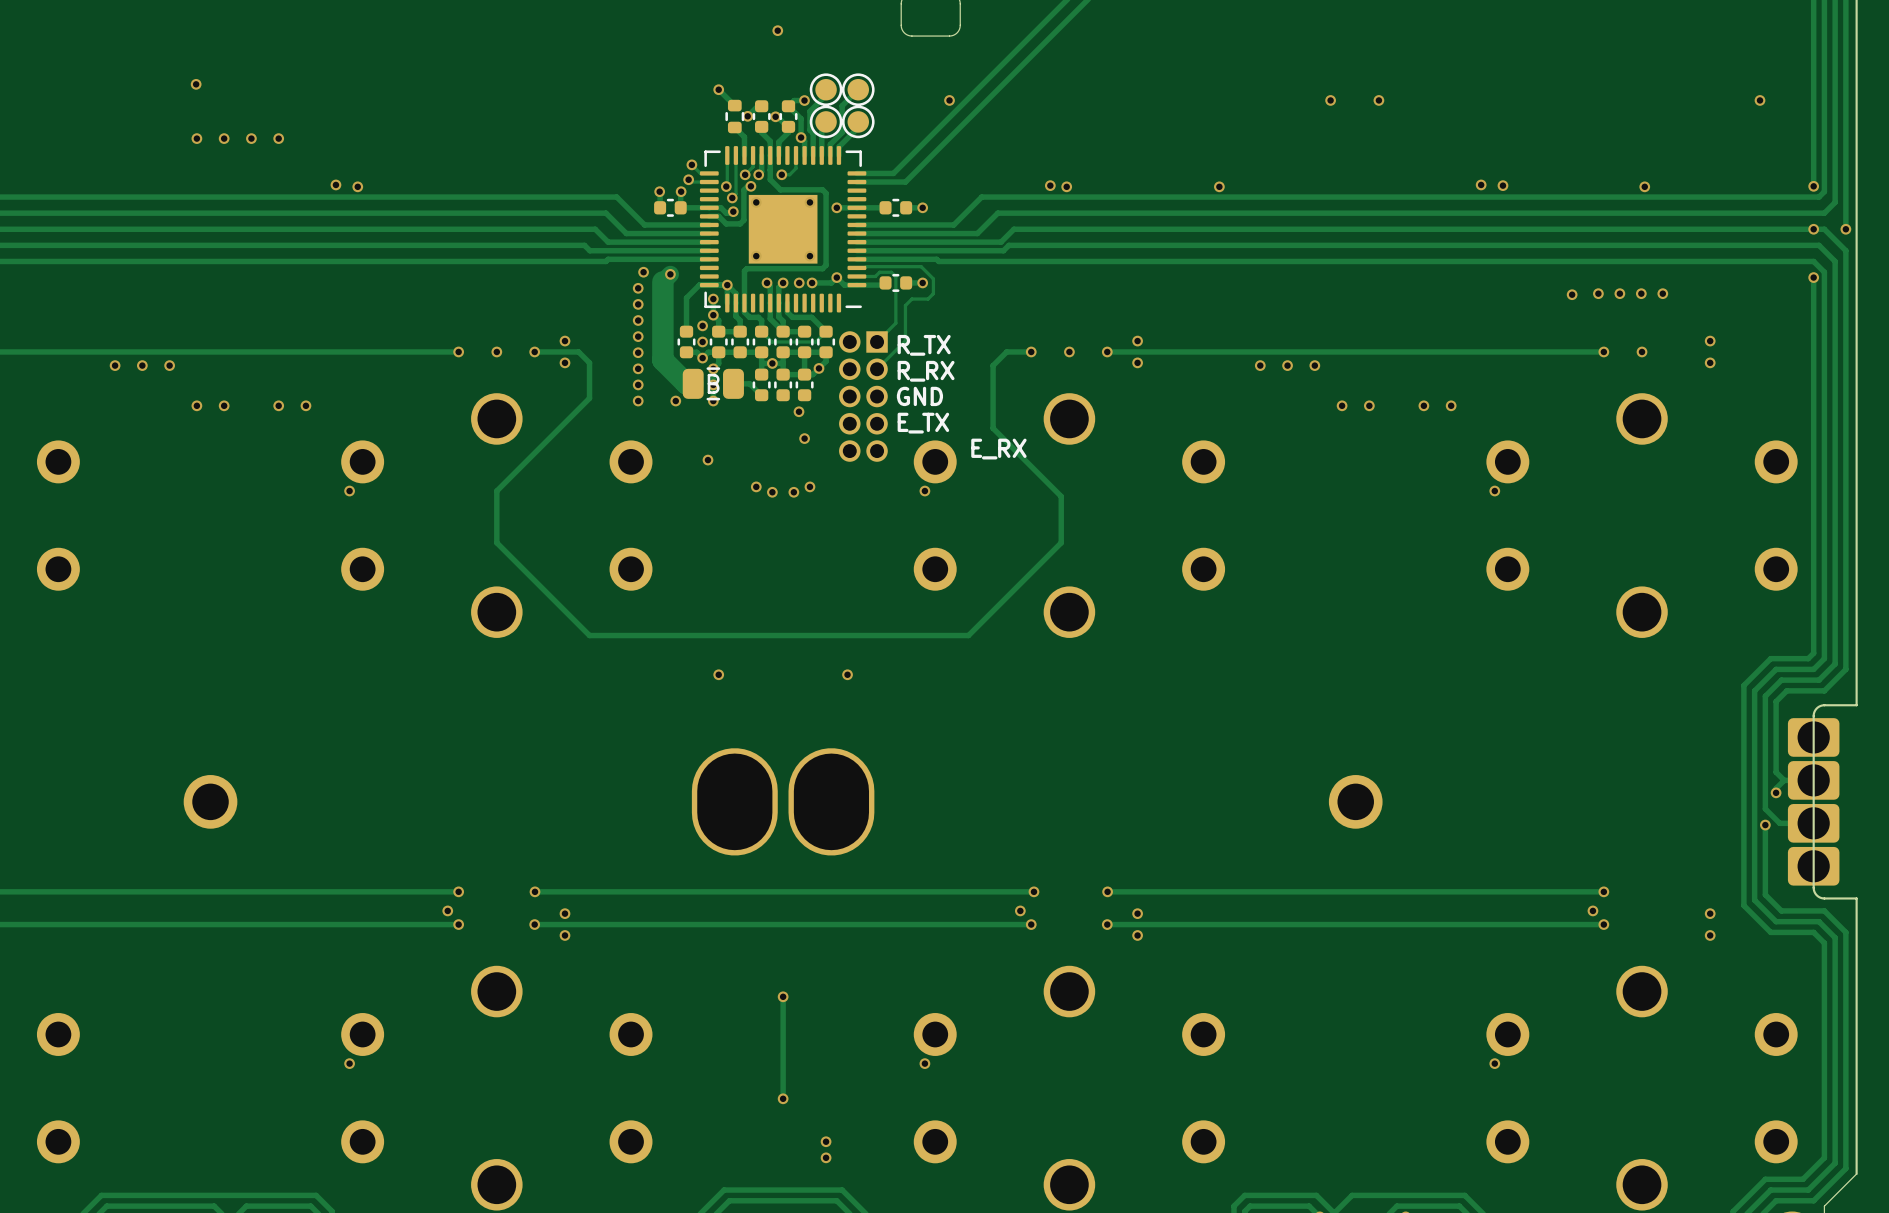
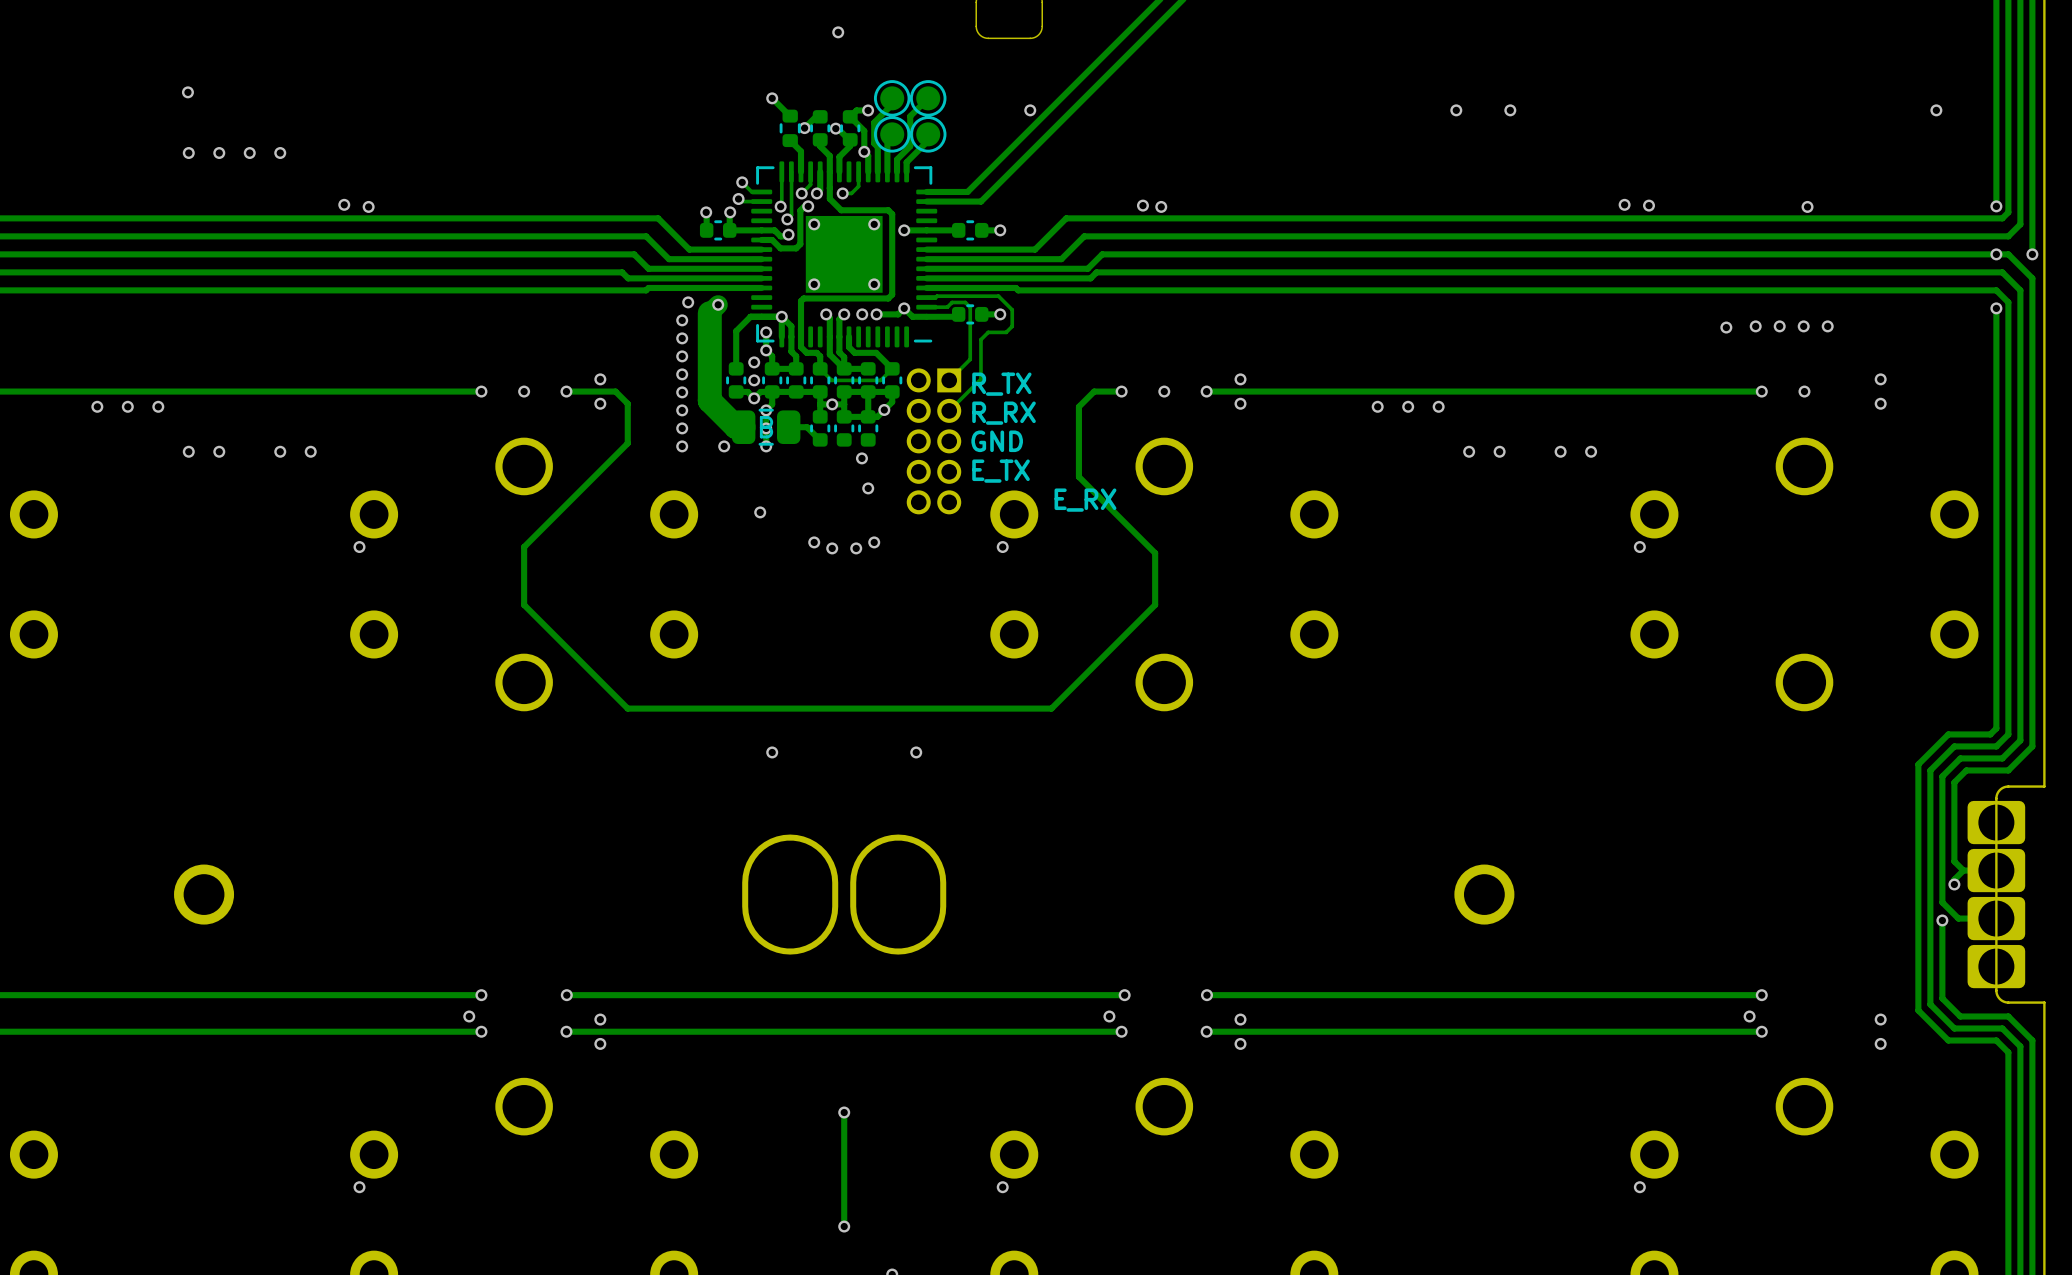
via: (1219, 186) -> none

